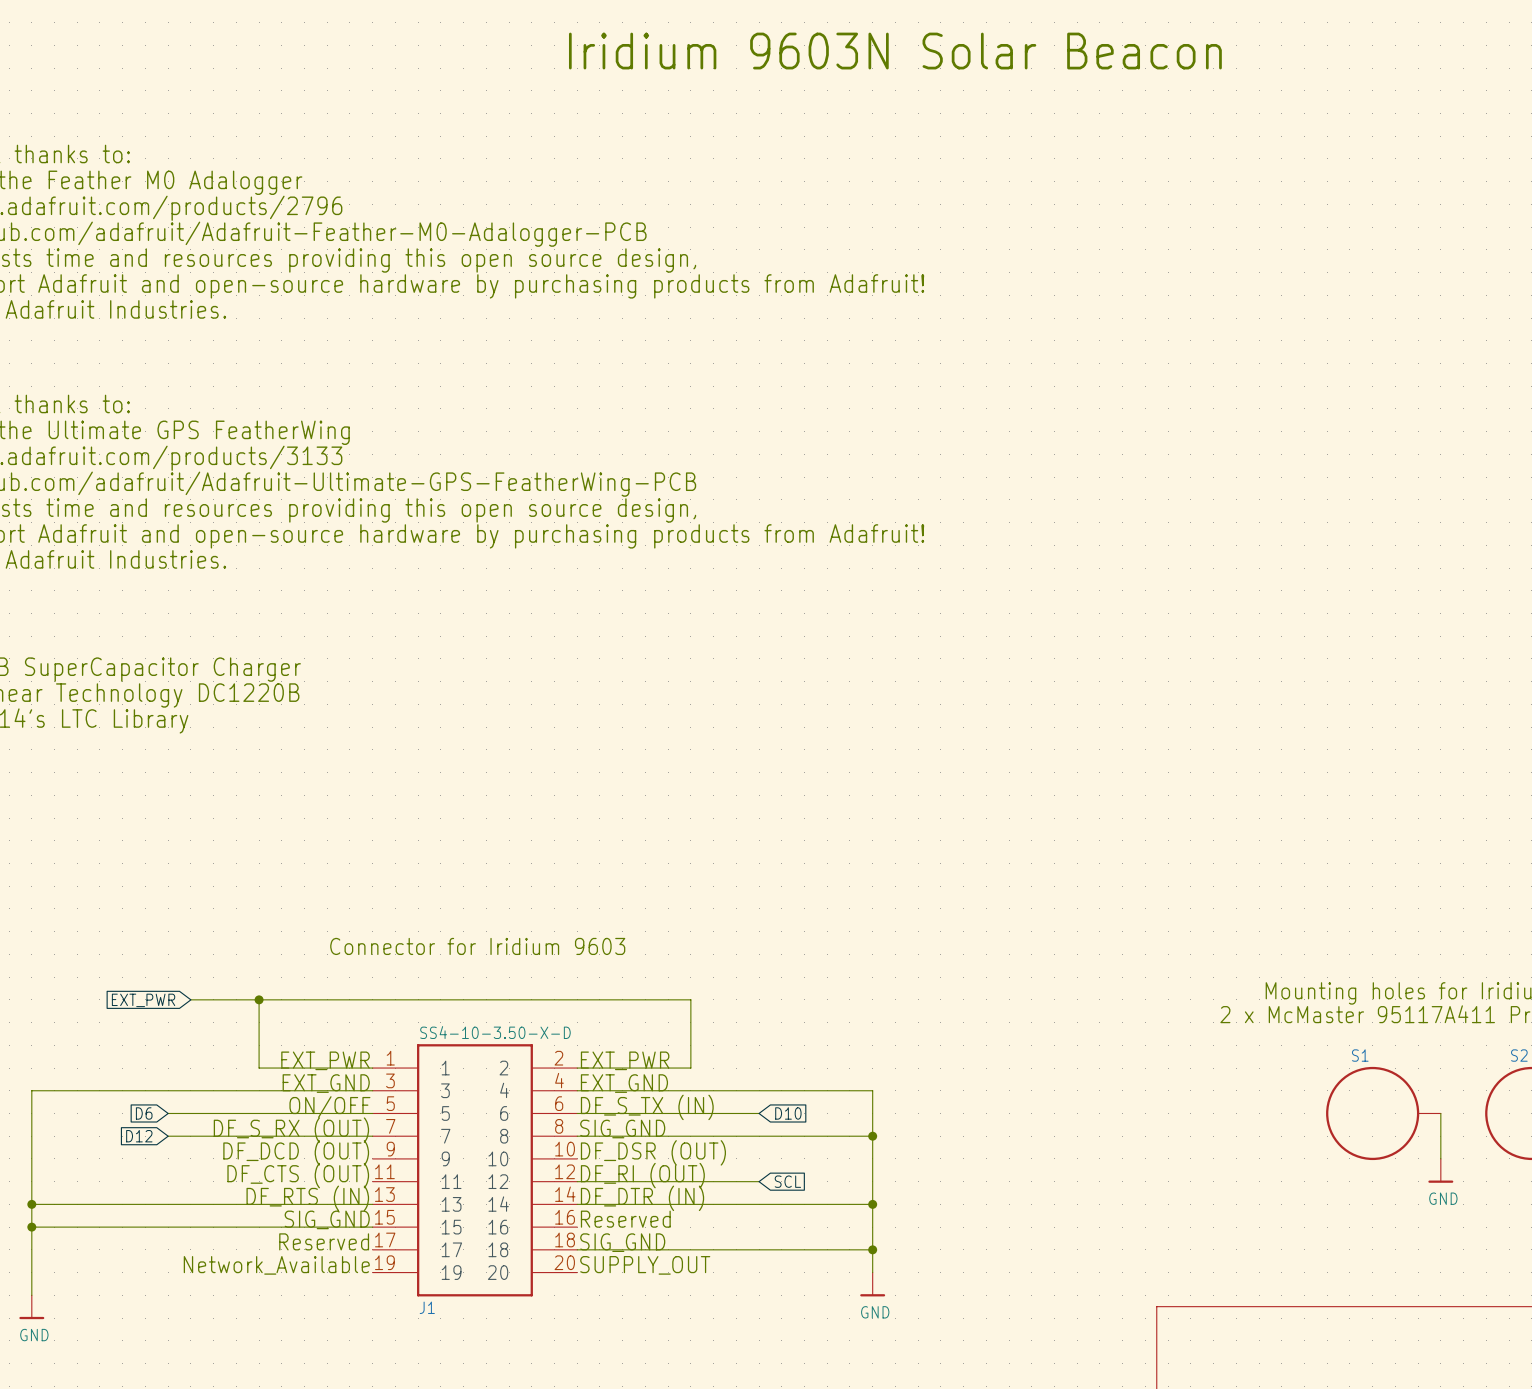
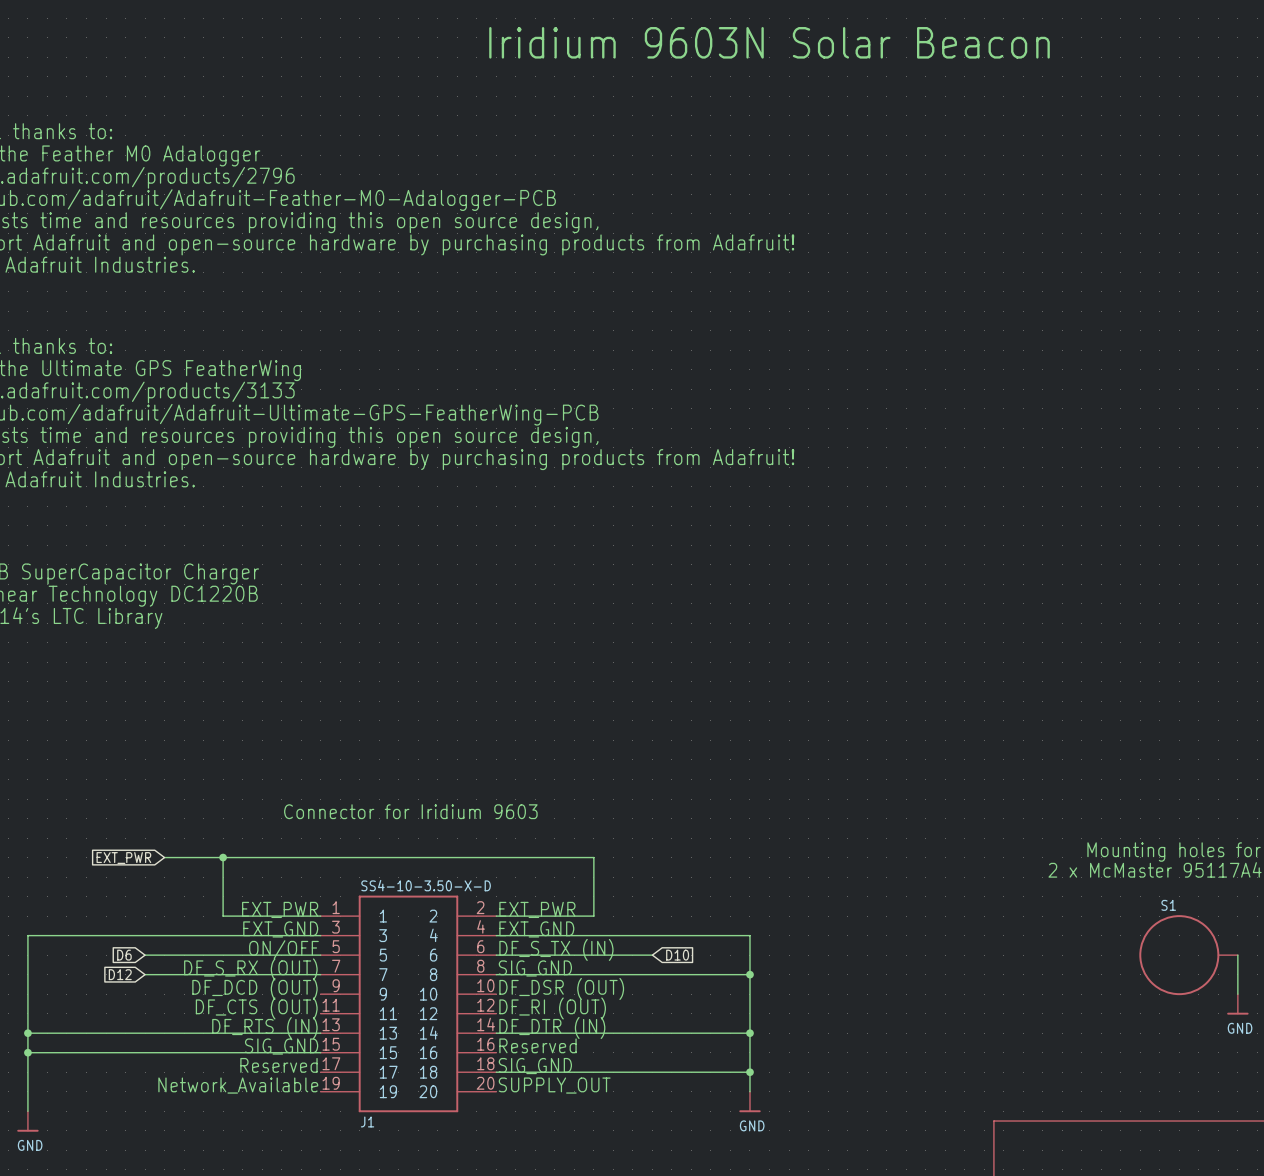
wire: (577, 1181) (759, 1181) -> none
global label: SCL (787, 1181) -> none

